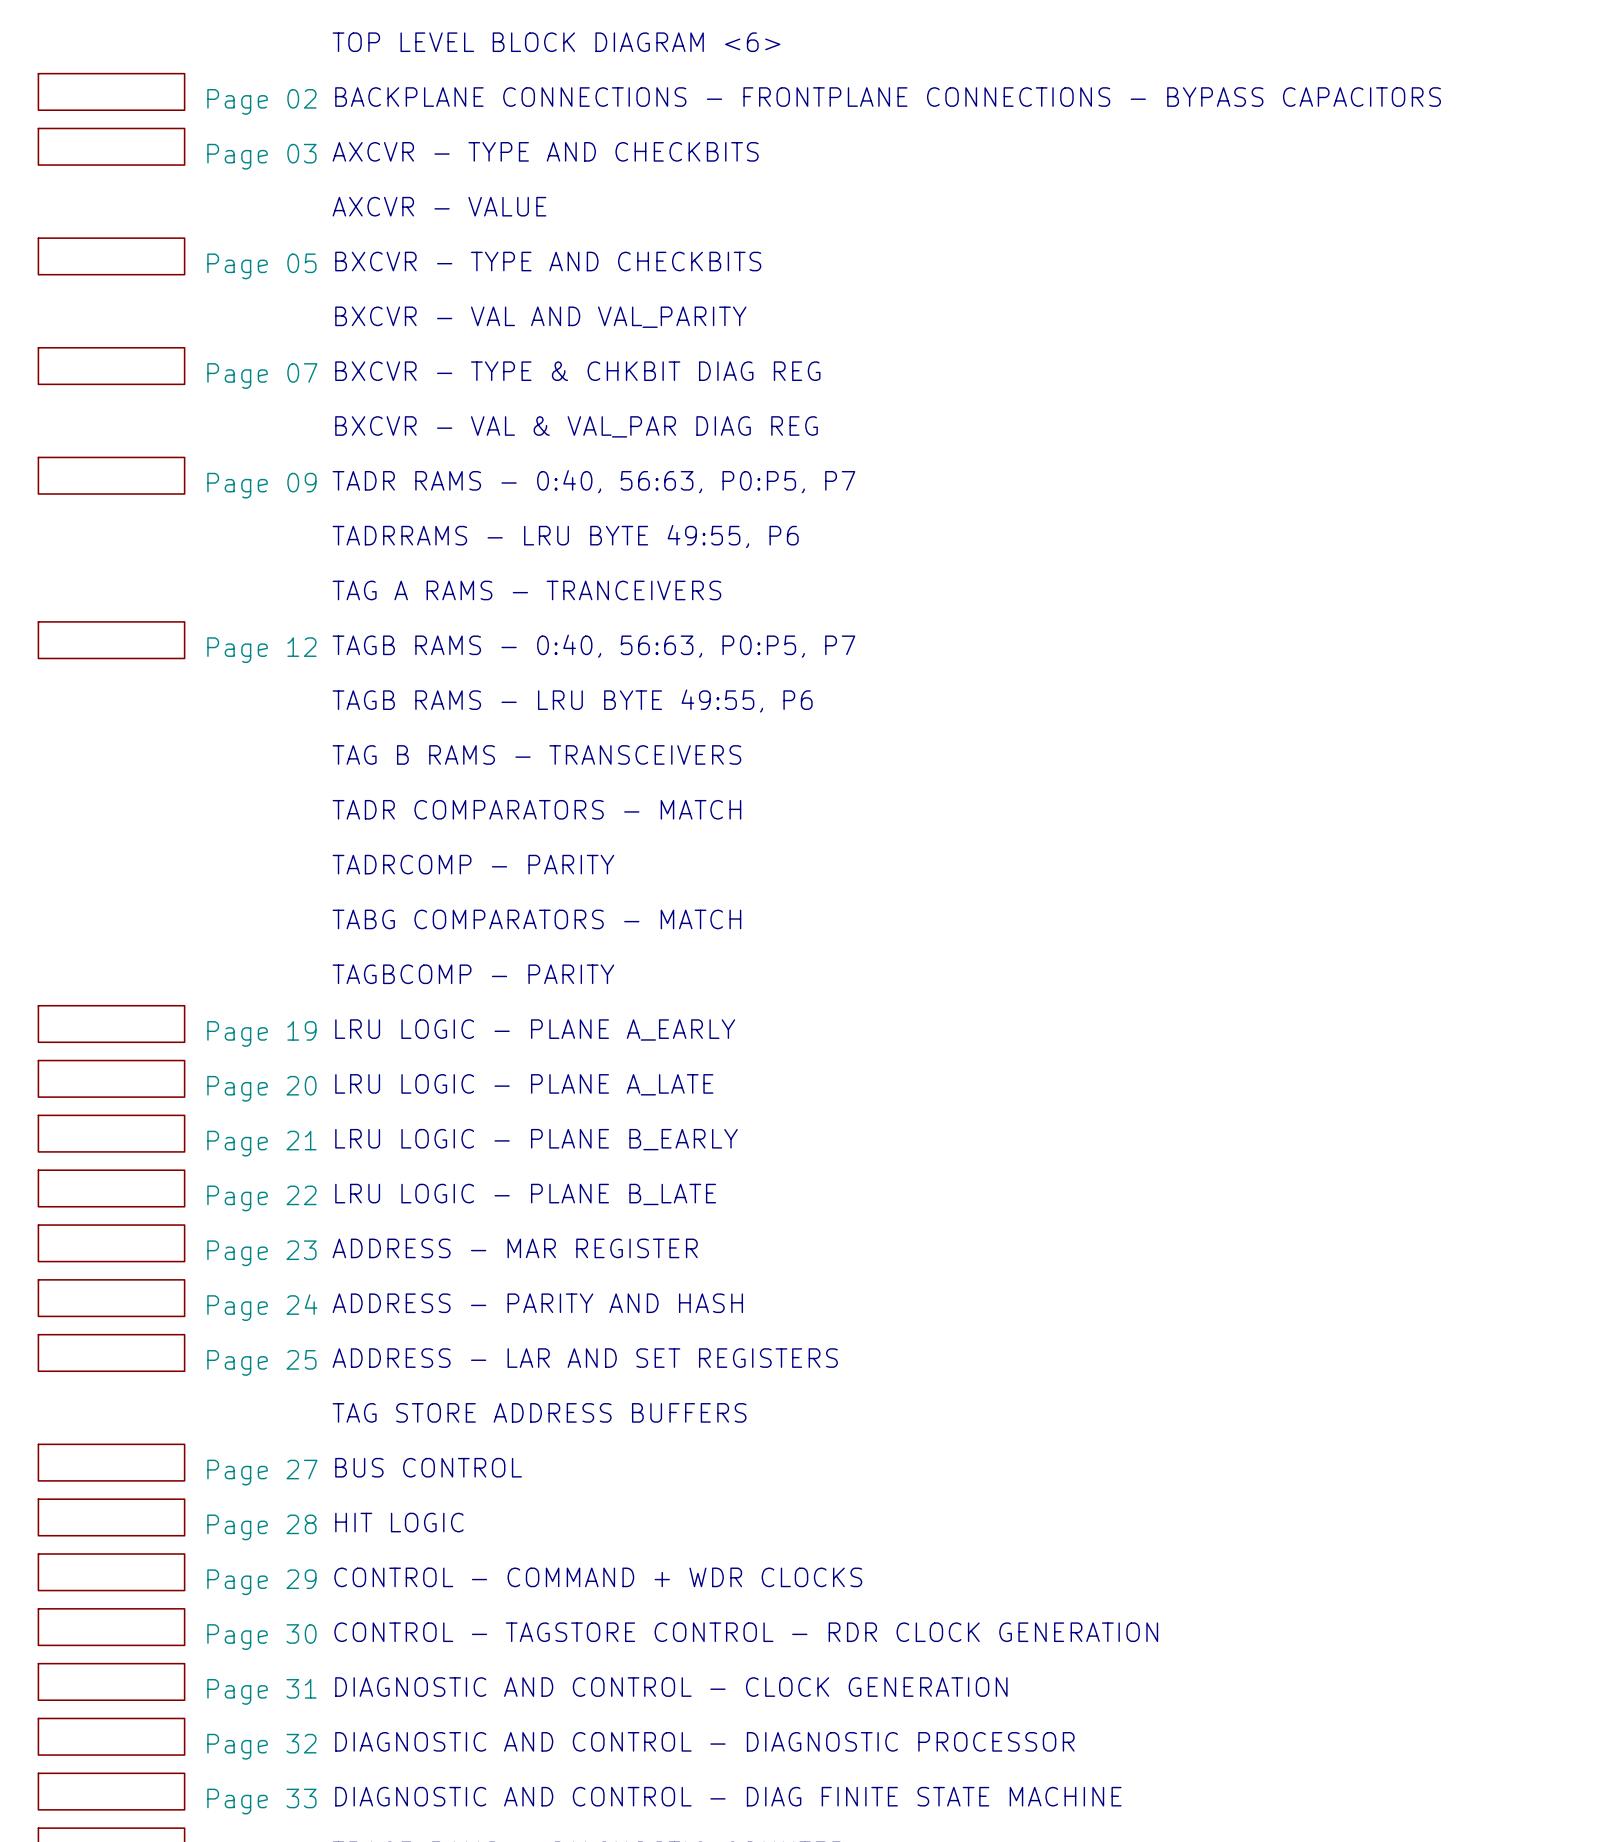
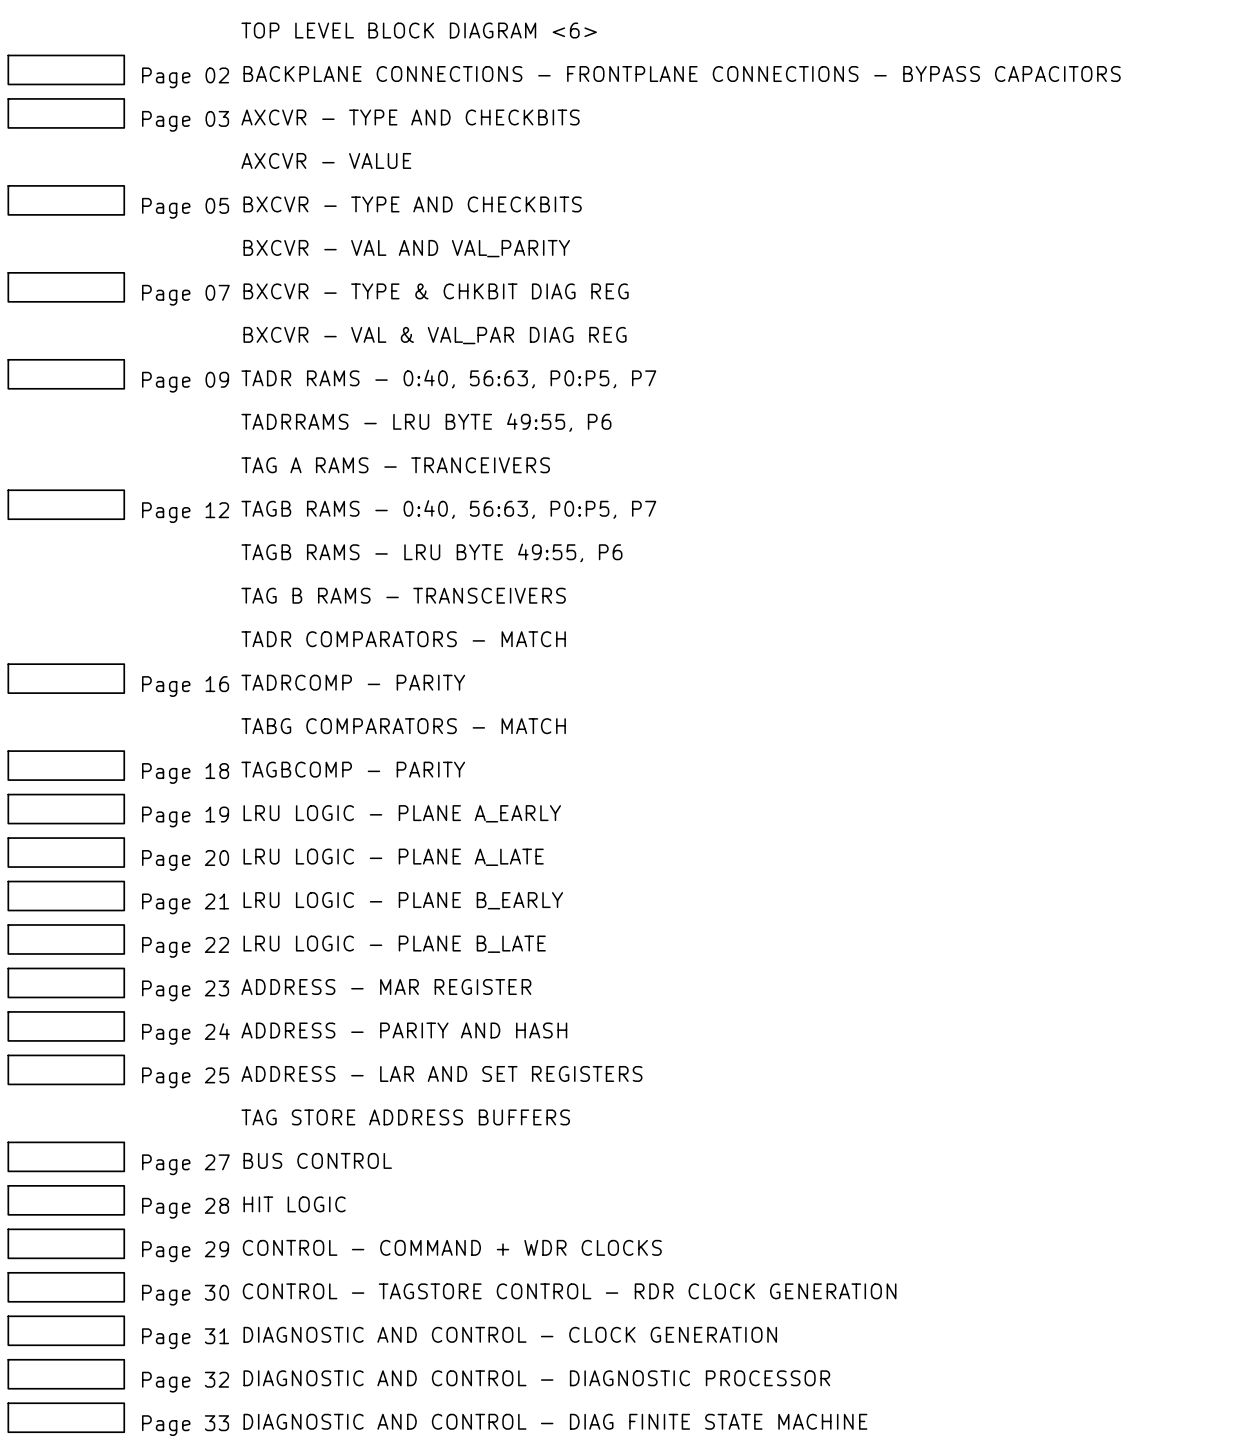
sheet Page 16: none -> (66, 678)
sheet Page 18: none -> (66, 765)

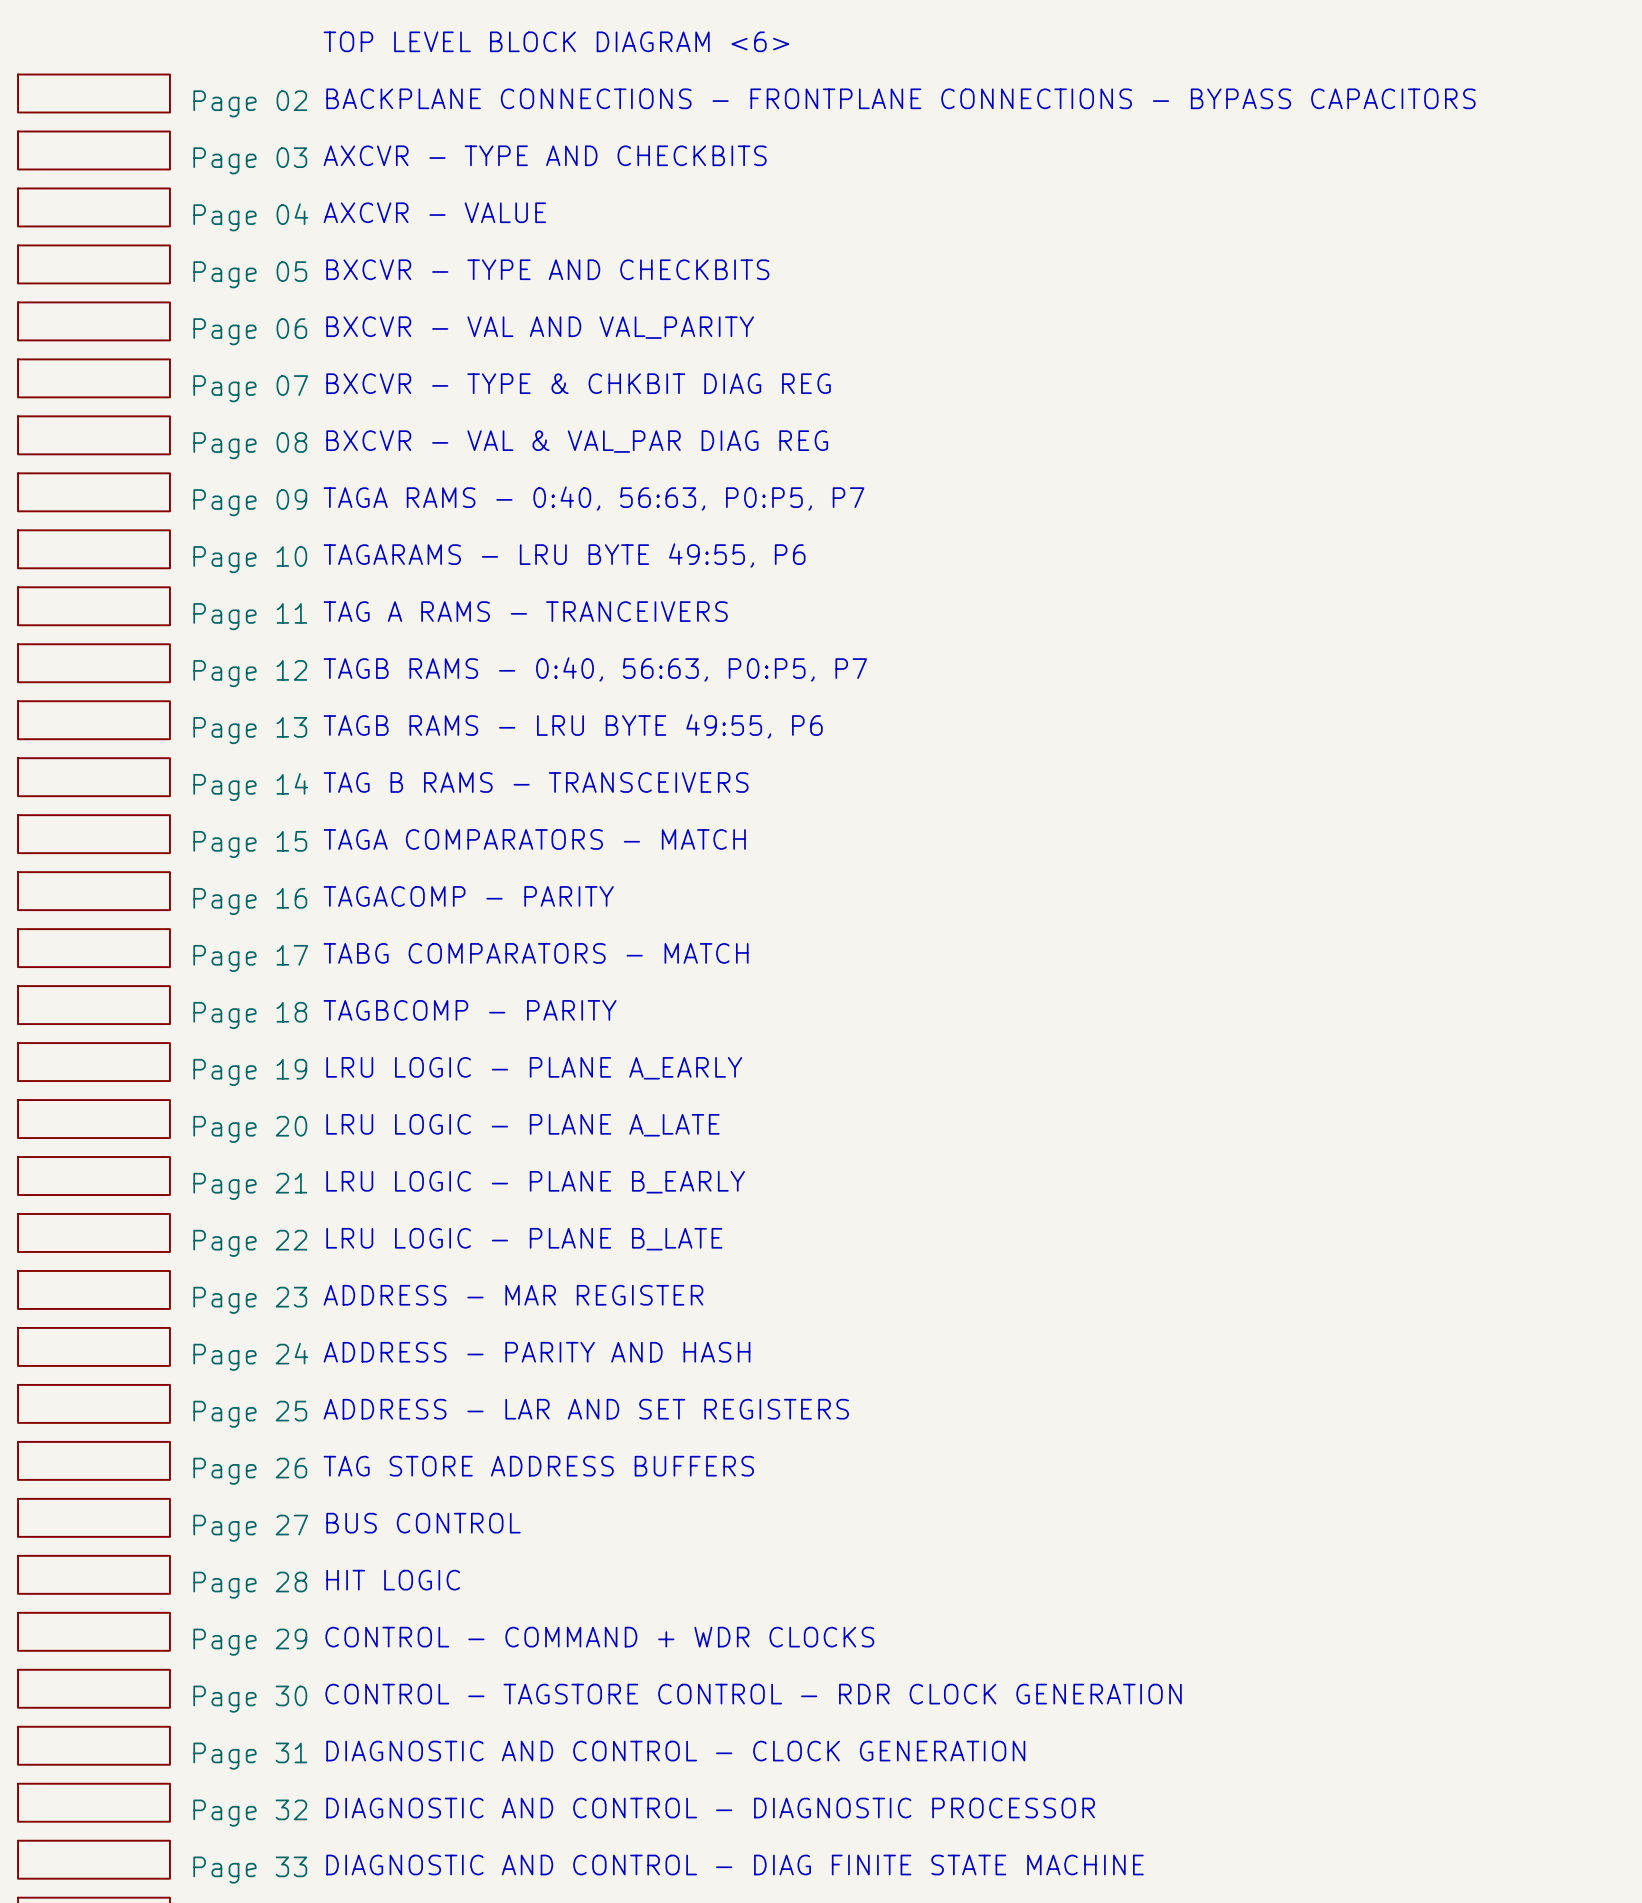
sheet Page 04: none -> (94, 207)
sheet Page 06: none -> (94, 321)
sheet Page 08: none -> (94, 435)
text: TADR RAMS - 0:40, 56:63, P0:P5, P7 (448, 379) -> TAGA RAMS - 0:40, 56:63, P0:P5, P7 (593, 498)
sheet Page 10: none -> (94, 549)
text: TADRRAMS - LRU BYTE 49:55, P6 (426, 422) -> TAGARAMS - LRU BYTE 49:55, P6 (564, 555)
sheet Page 11: none -> (94, 606)
sheet Page 13: none -> (94, 720)
sheet Page 14: none -> (94, 777)
sheet Page 15: none -> (94, 834)
text: TADR COMPARATORS - MATCH (403, 639) -> TAGA COMPARATORS - MATCH (534, 839)
text: TADRCOMP - PARITY (353, 682) -> TAGACOMP - PARITY (468, 896)
sheet Page 17: none -> (94, 948)
sheet Page 26: none -> (94, 1460)

